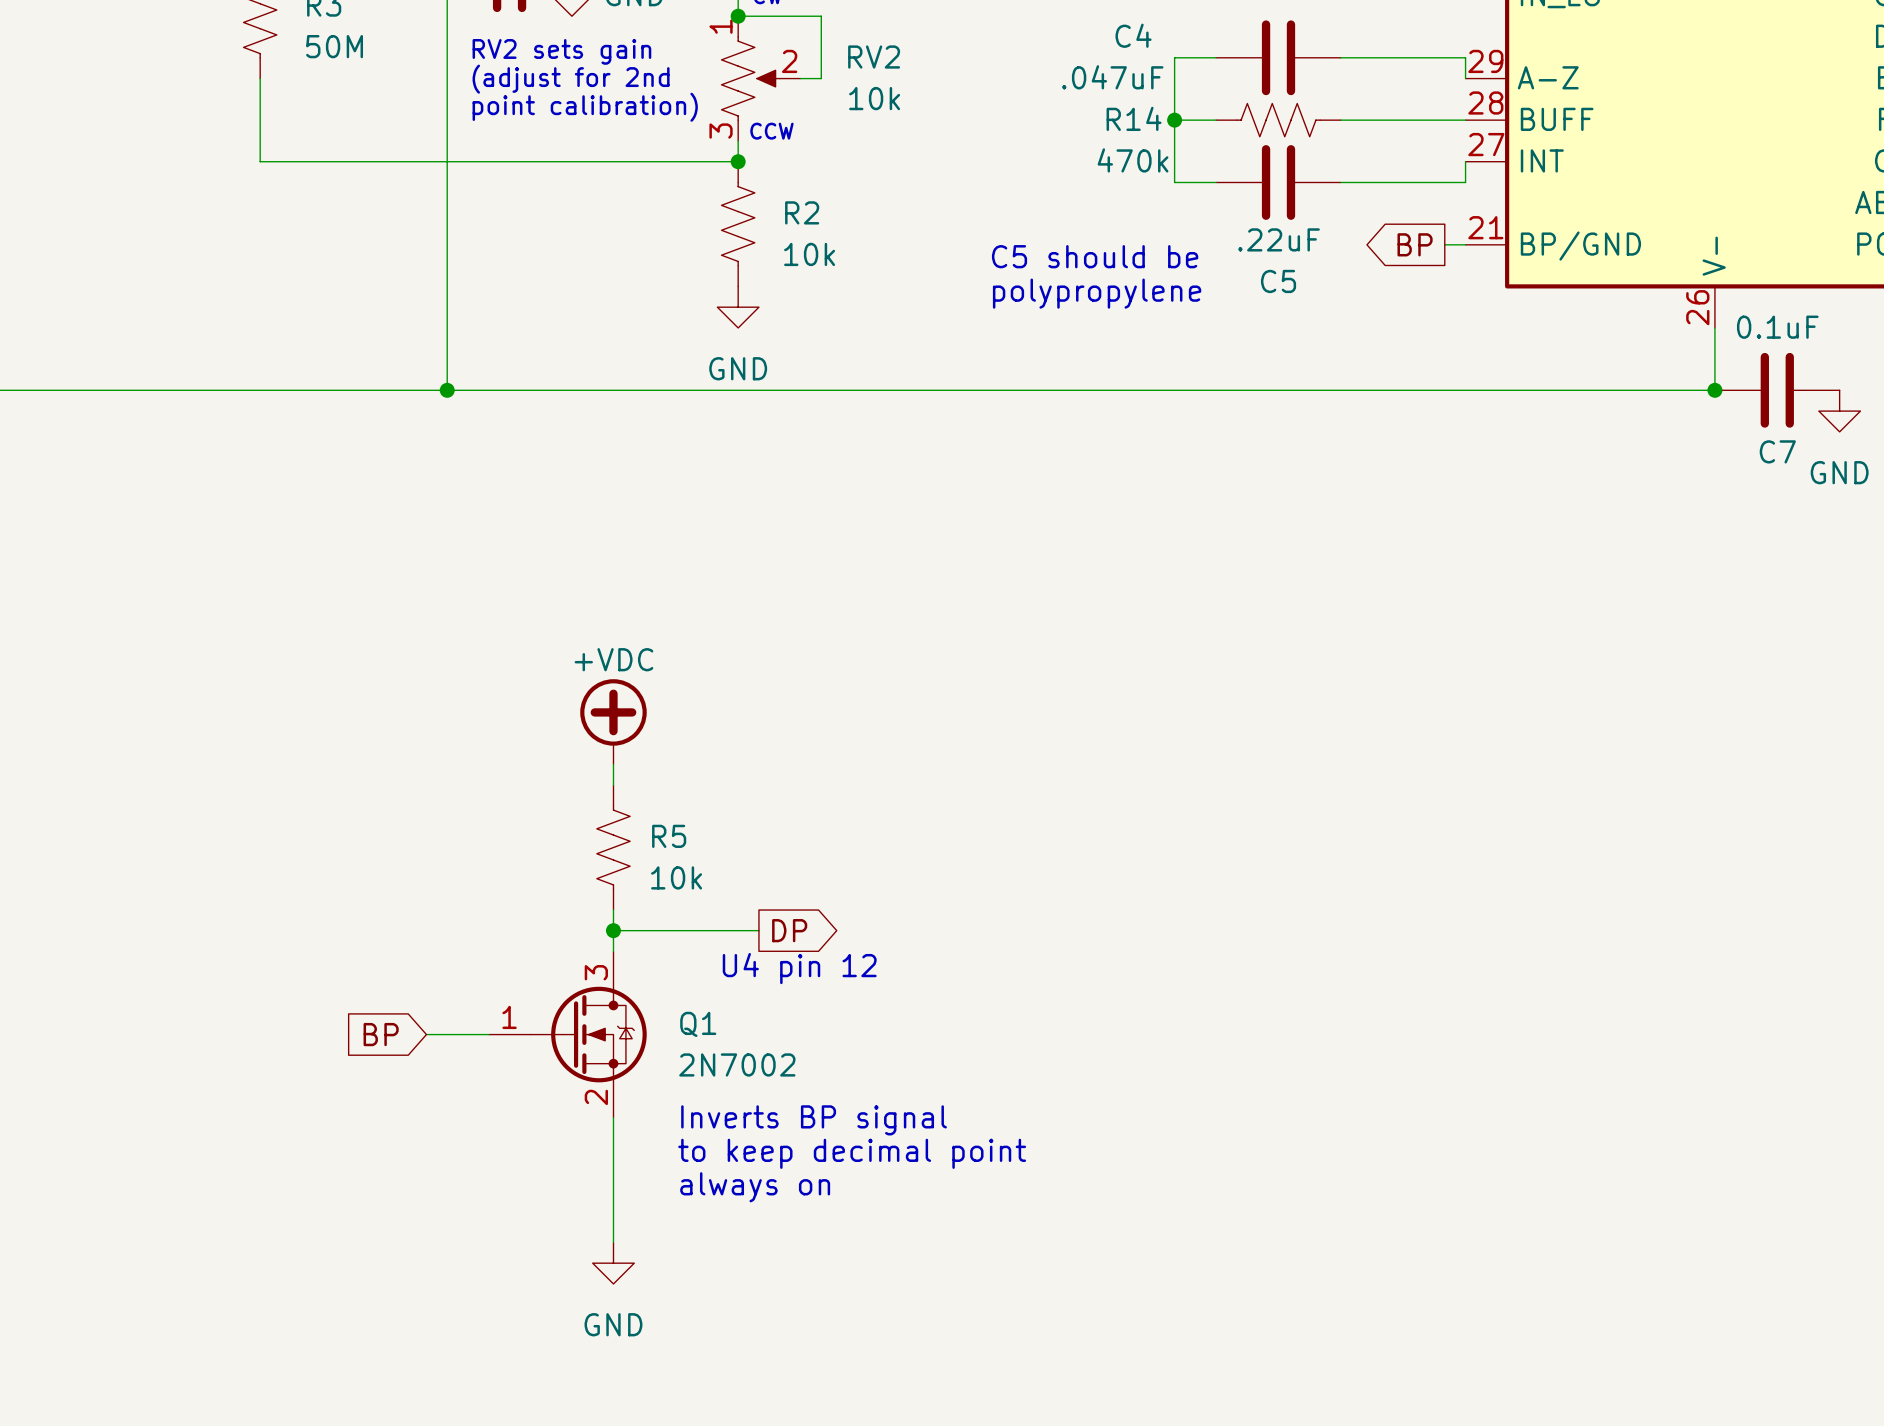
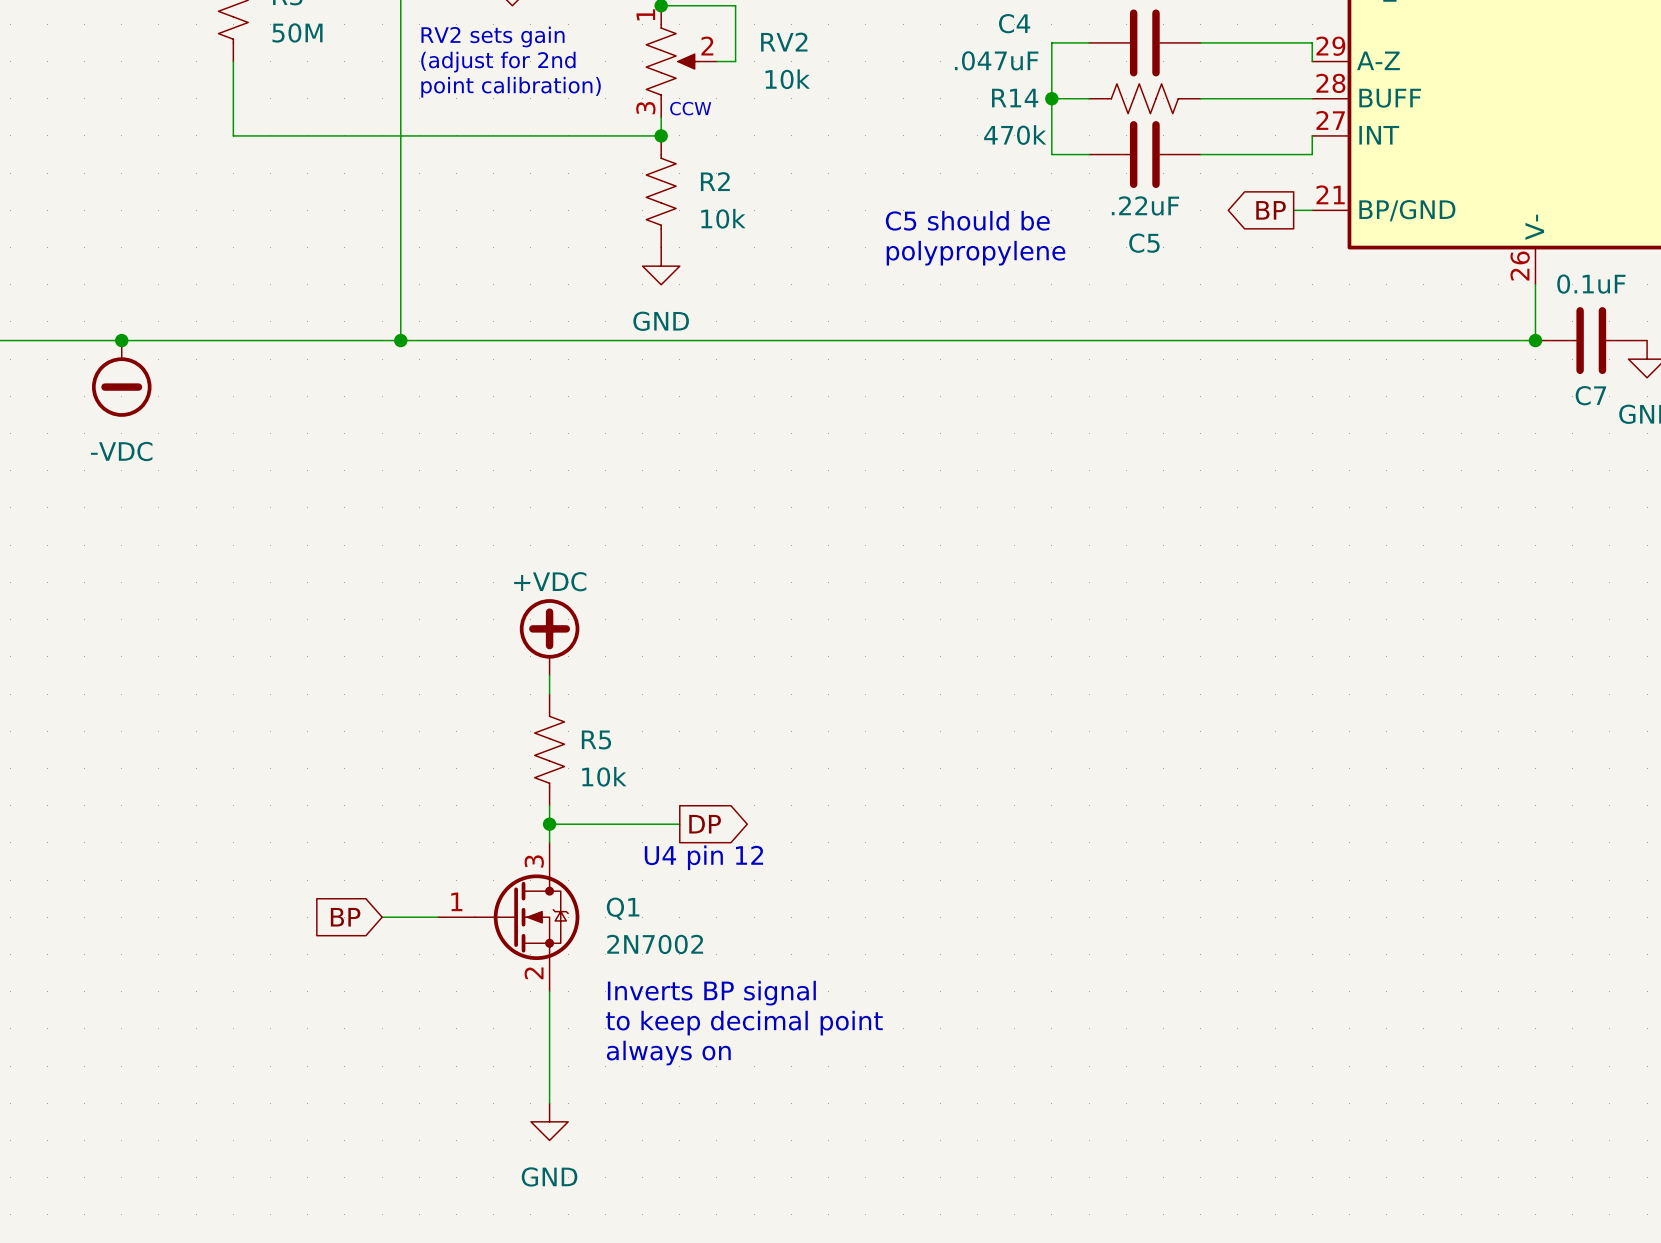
junction: none -> (121, 340)
power symbol: none -> -VDC (121, 378)

